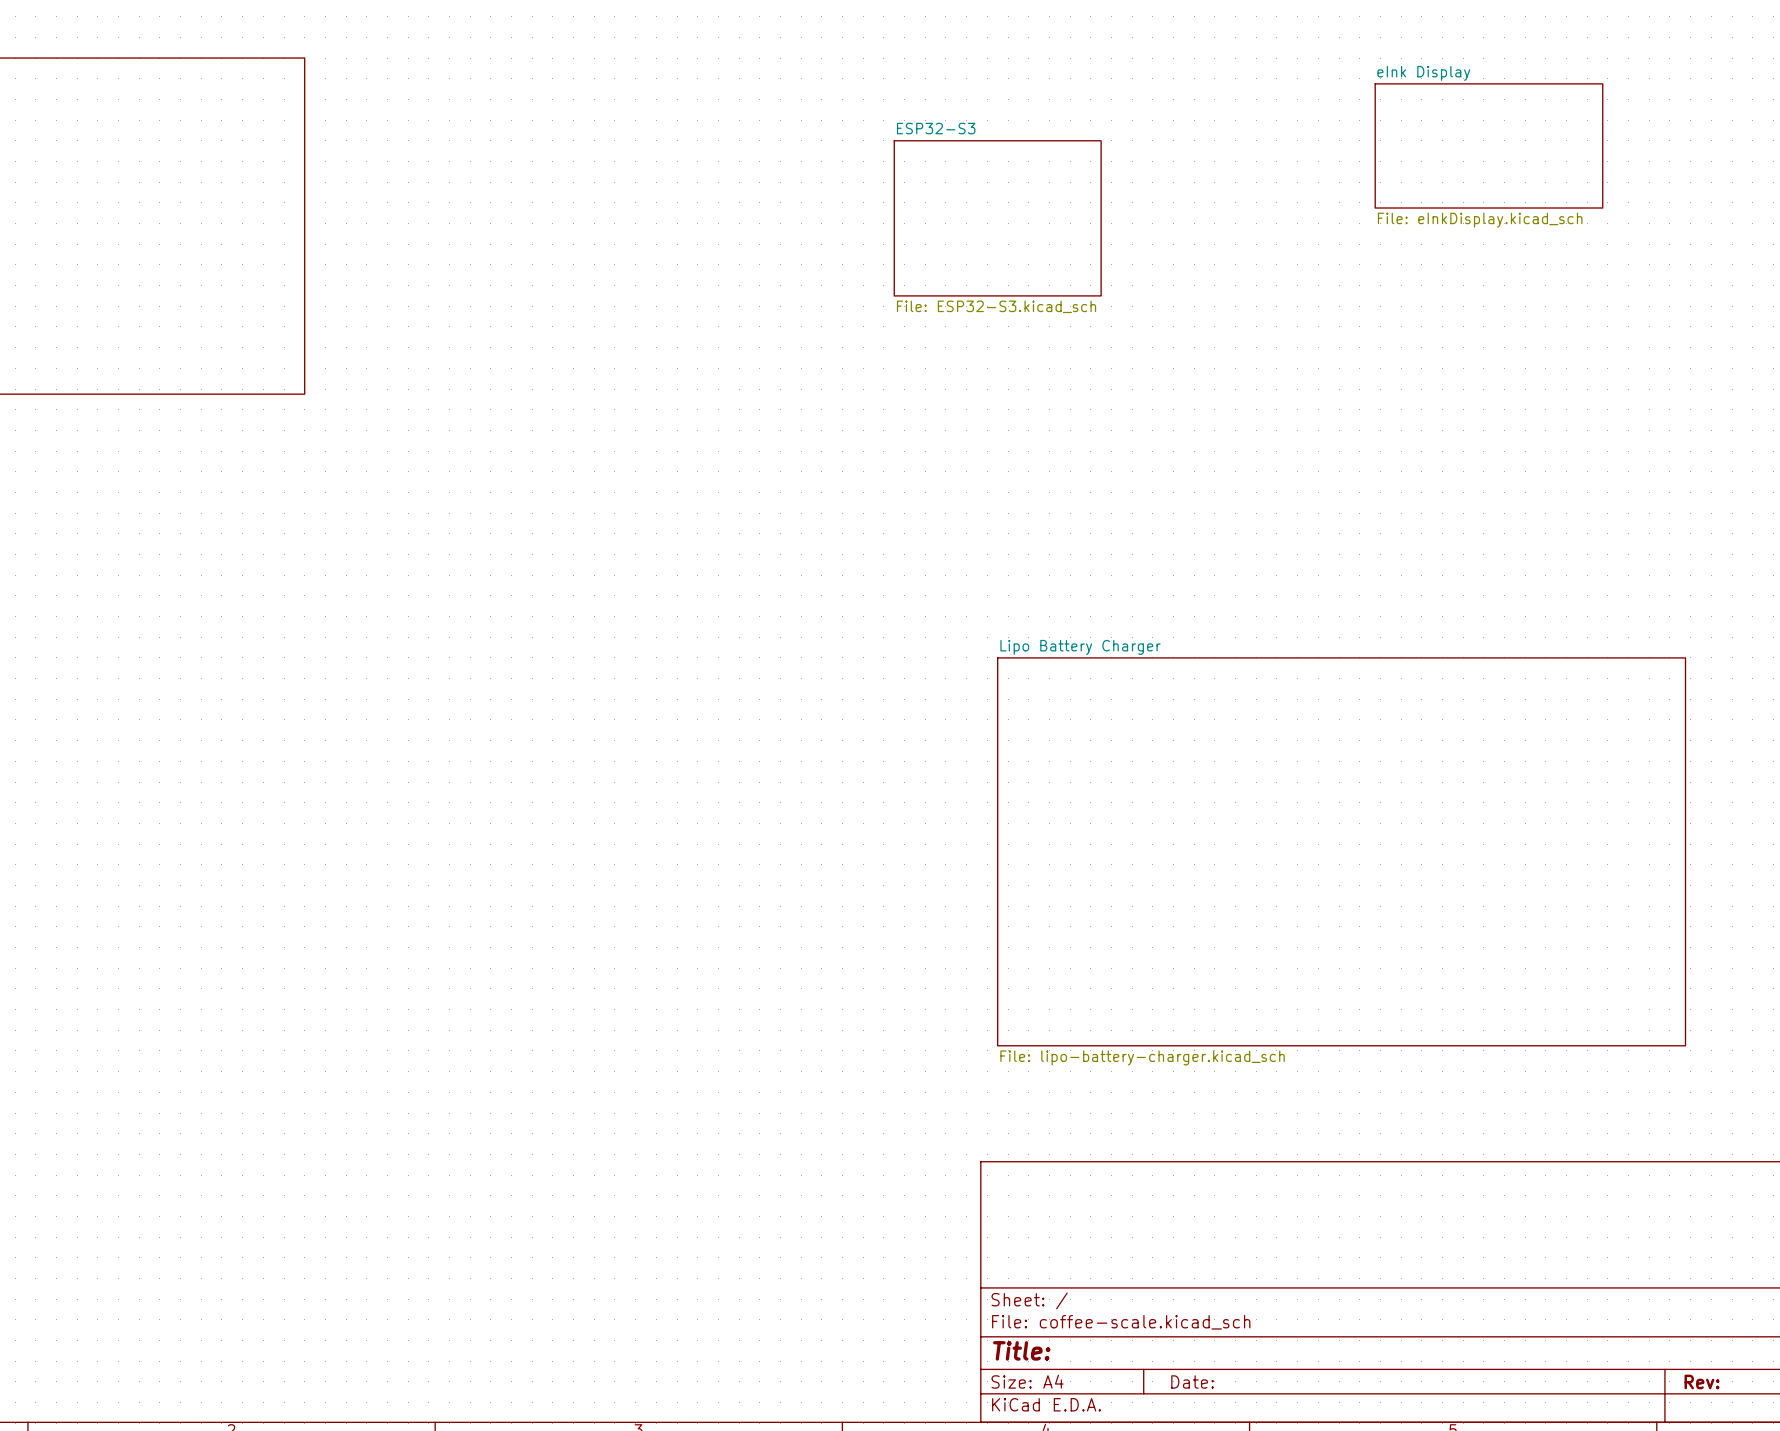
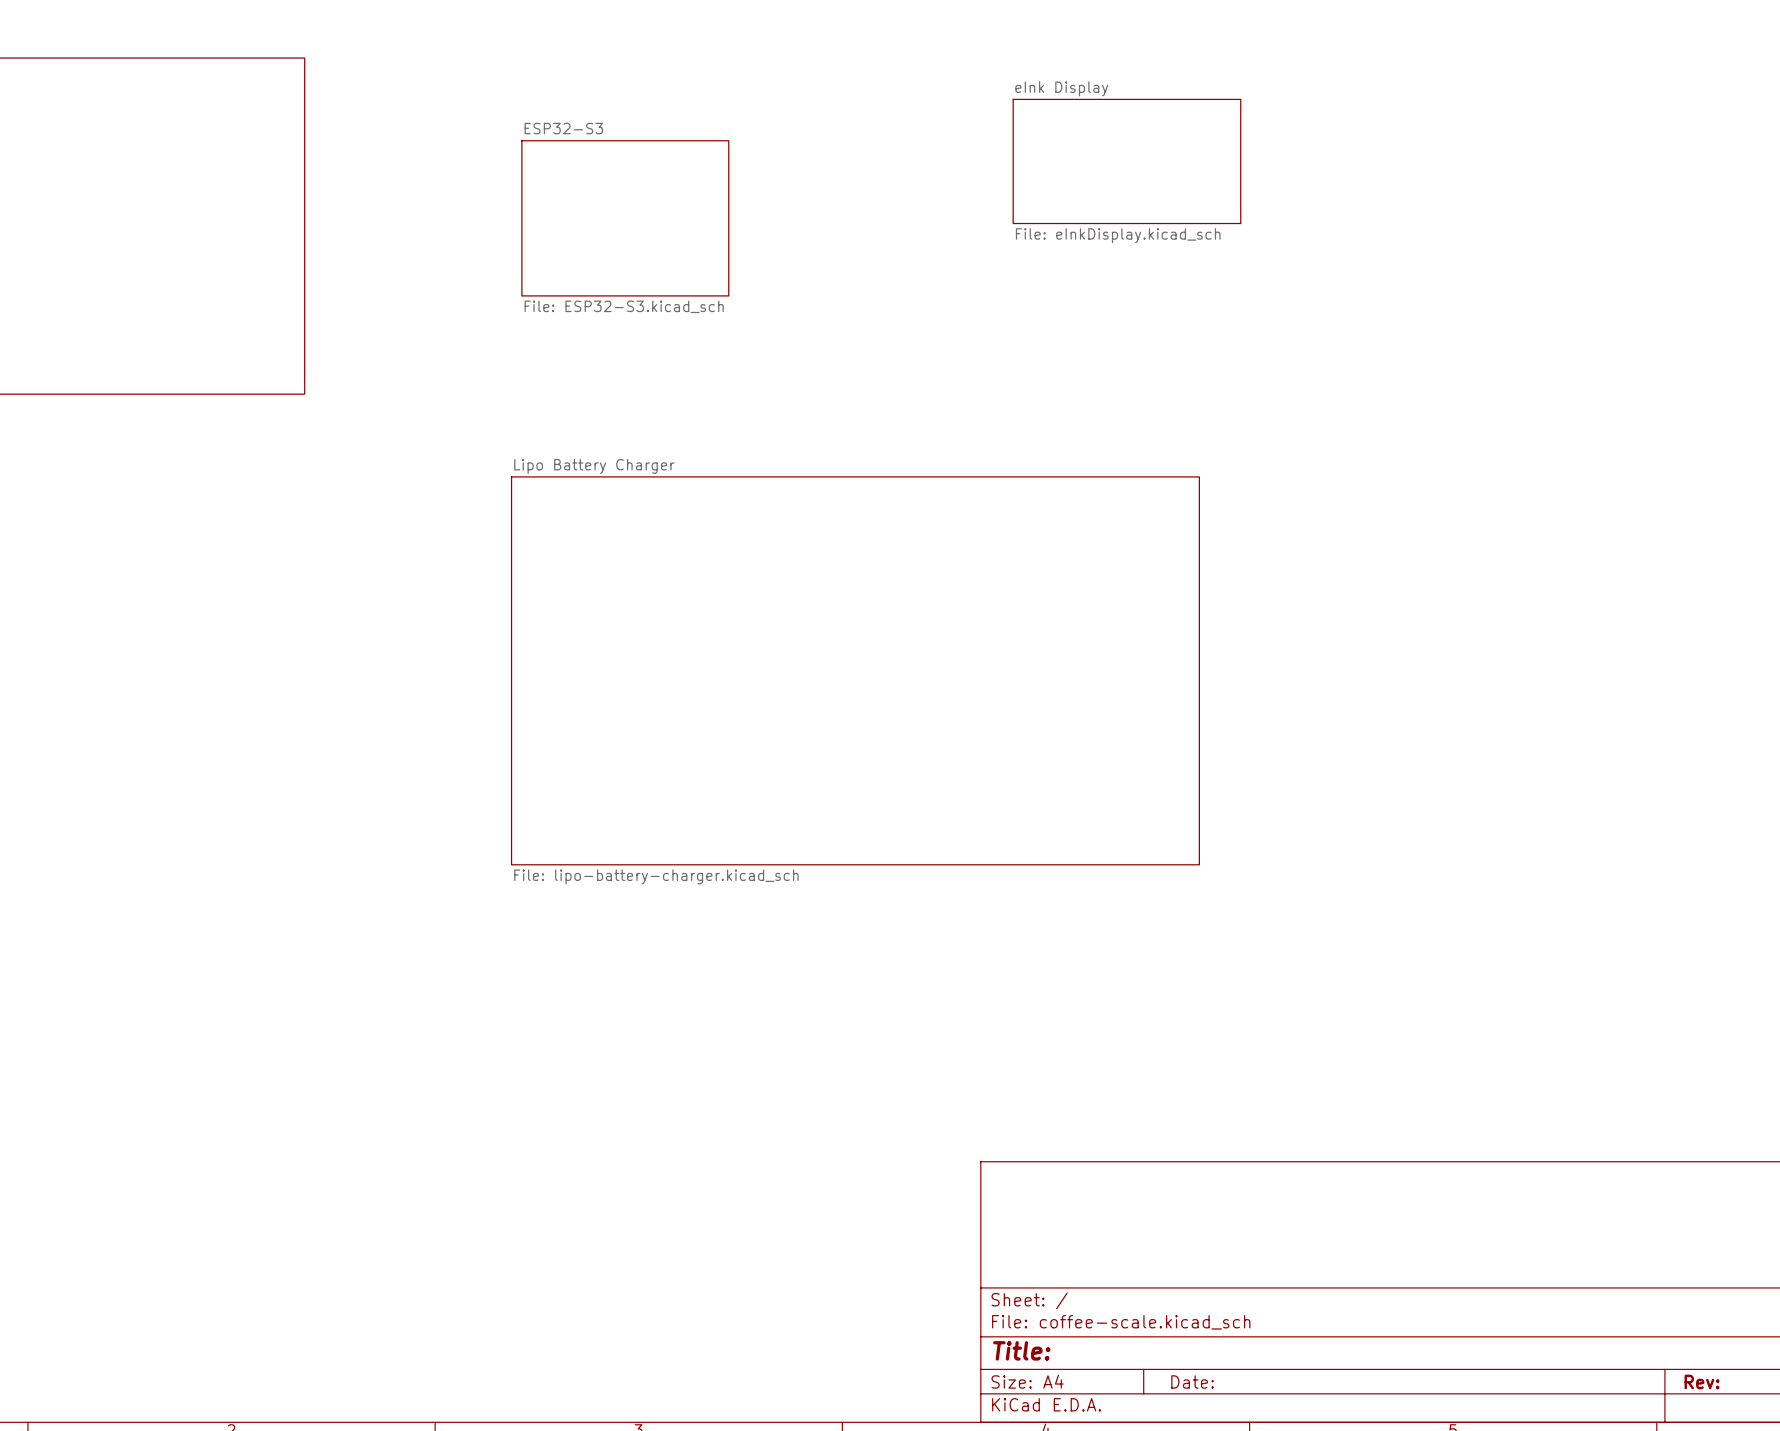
sheet eInk Display: File: eInkDisplay.kicad_sch (1488, 145) -> none
sheet eInk Display: none -> File: eInkDisplay.kicad_sch (1126, 161)
sheet ESP32-S3 position: (997, 218) -> (625, 218)
sheet Lipo Battery Charger: none -> File: lipo-battery-charger.kicad_sch (855, 670)
sheet Lipo Battery Charger: File: lipo-battery-charger.kicad_sch (1341, 851) -> none

